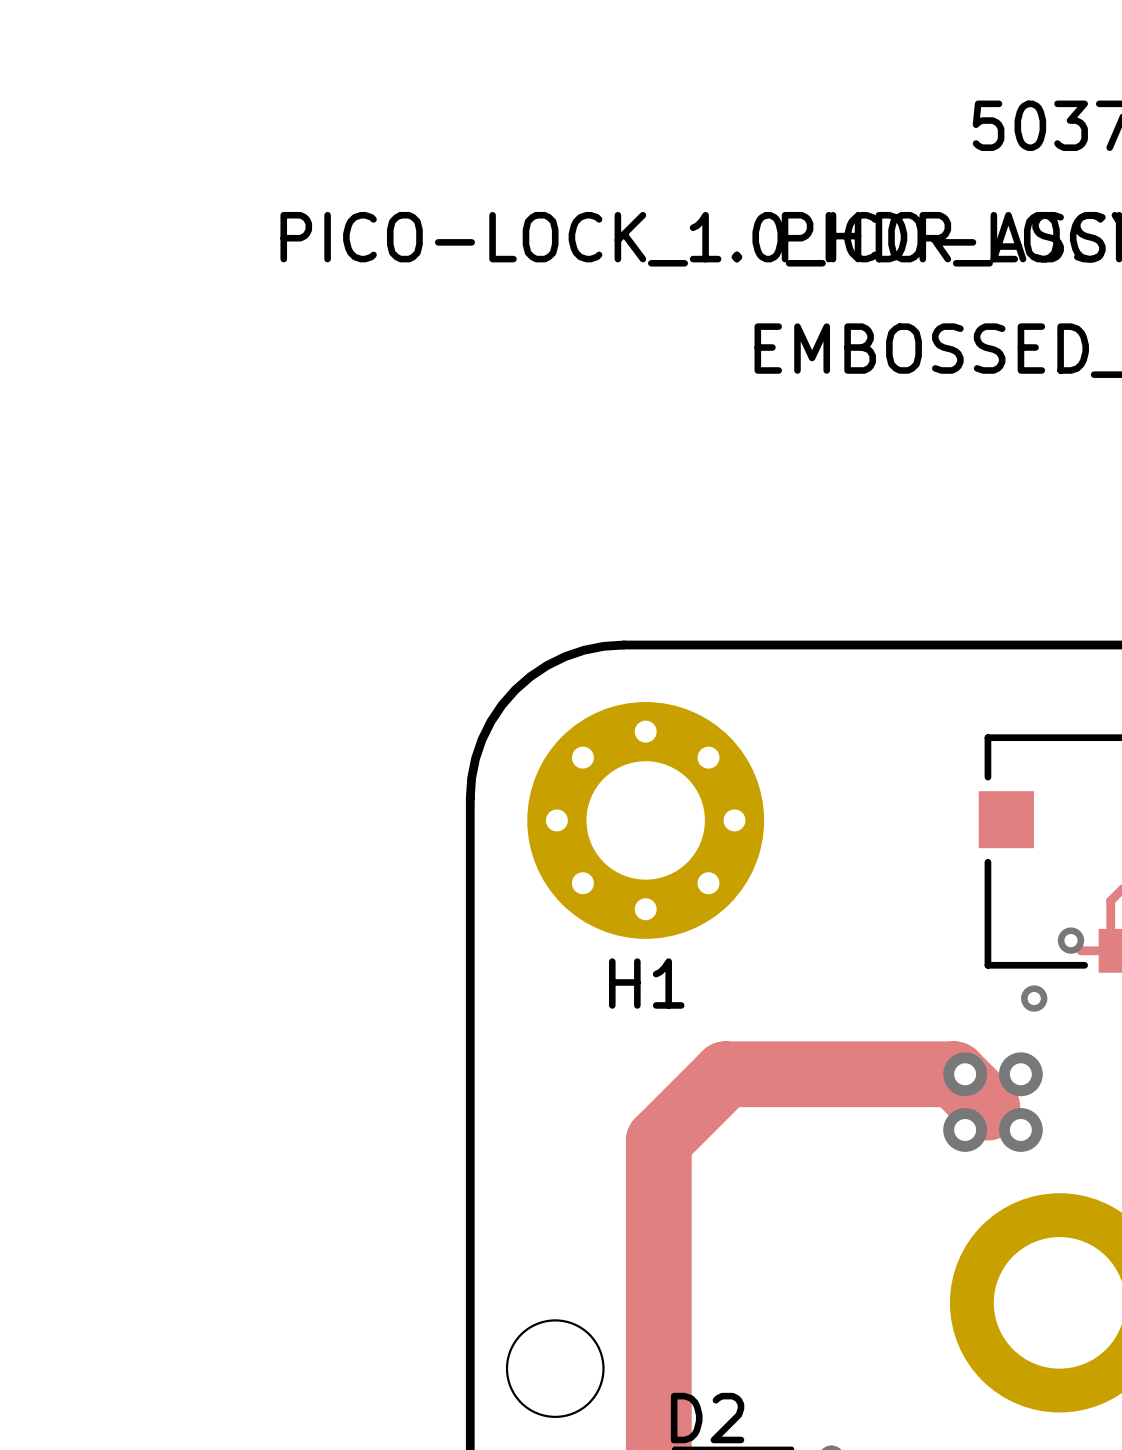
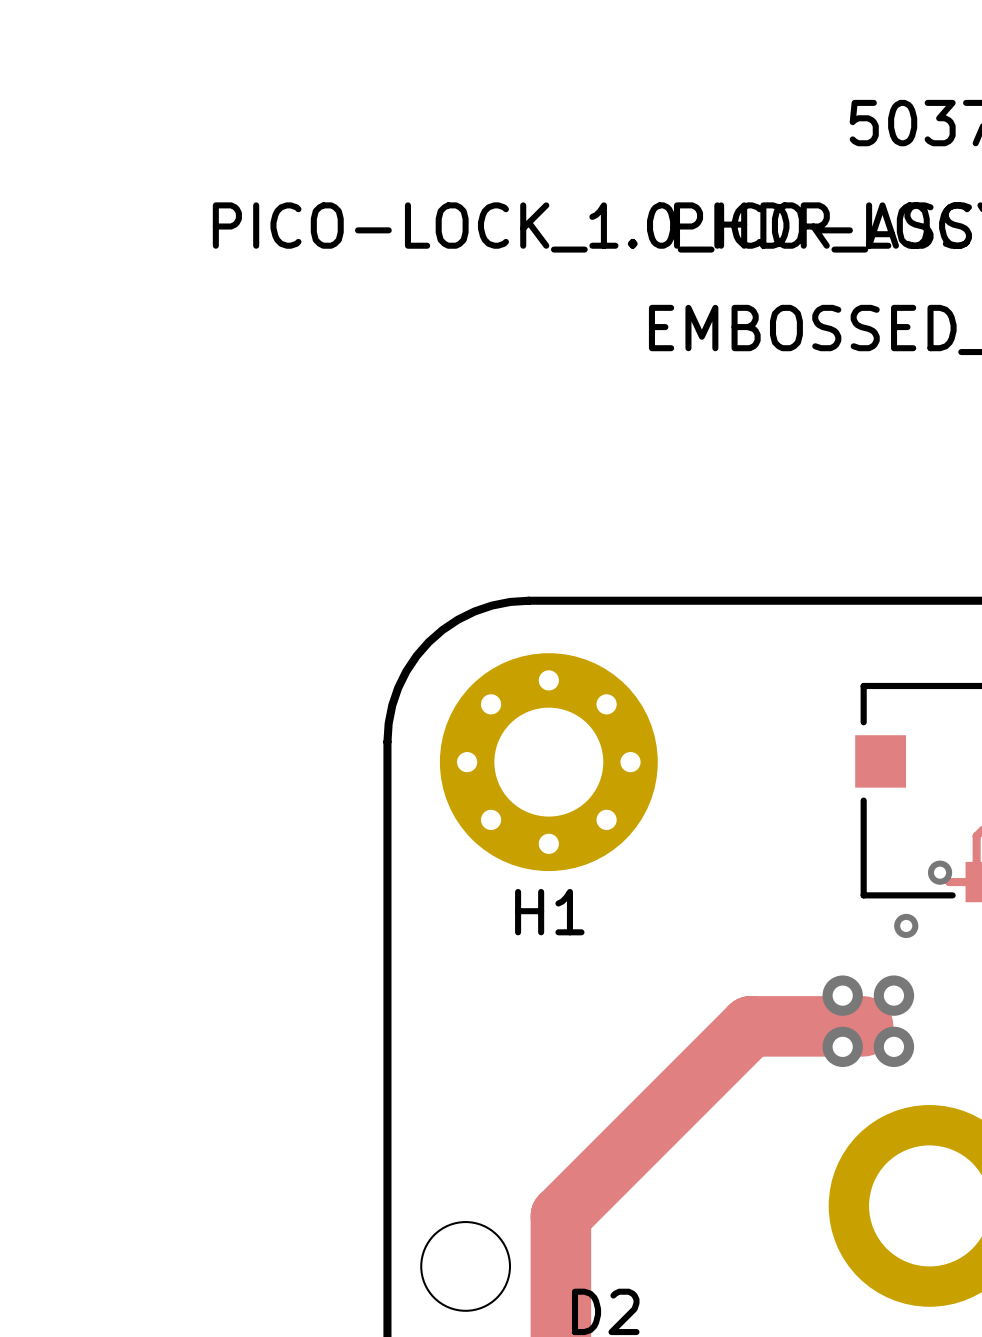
track: (987, 1107) (954, 1074) (725, 1074) (658, 1141) (658, 1313) -> (863, 1026) (750, 1026) (560, 1215)

